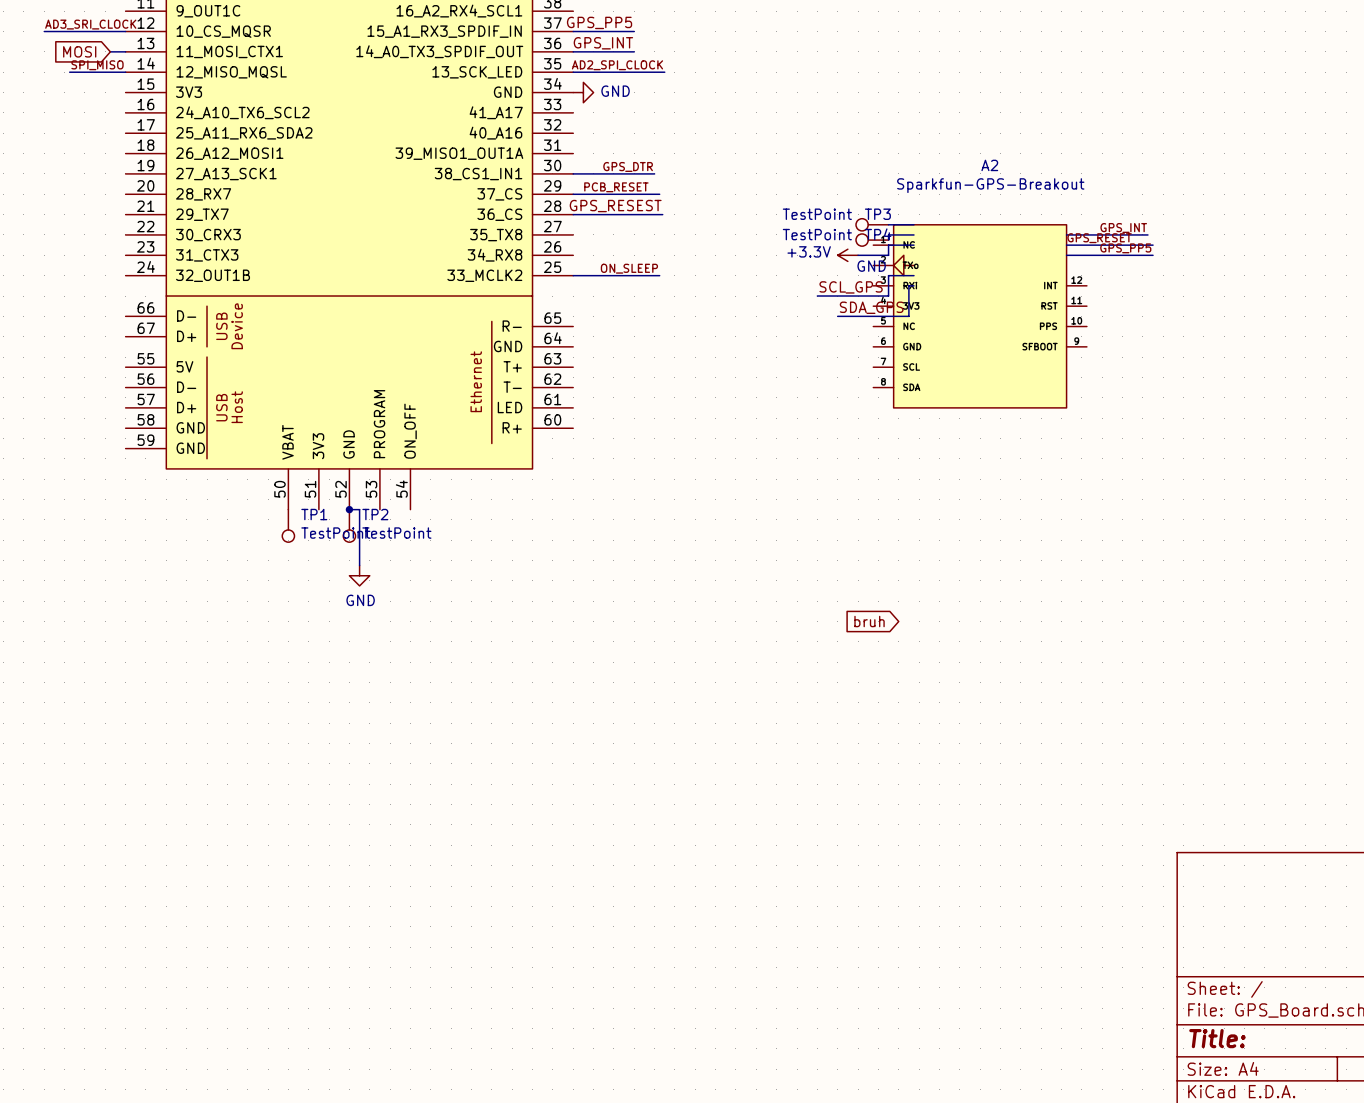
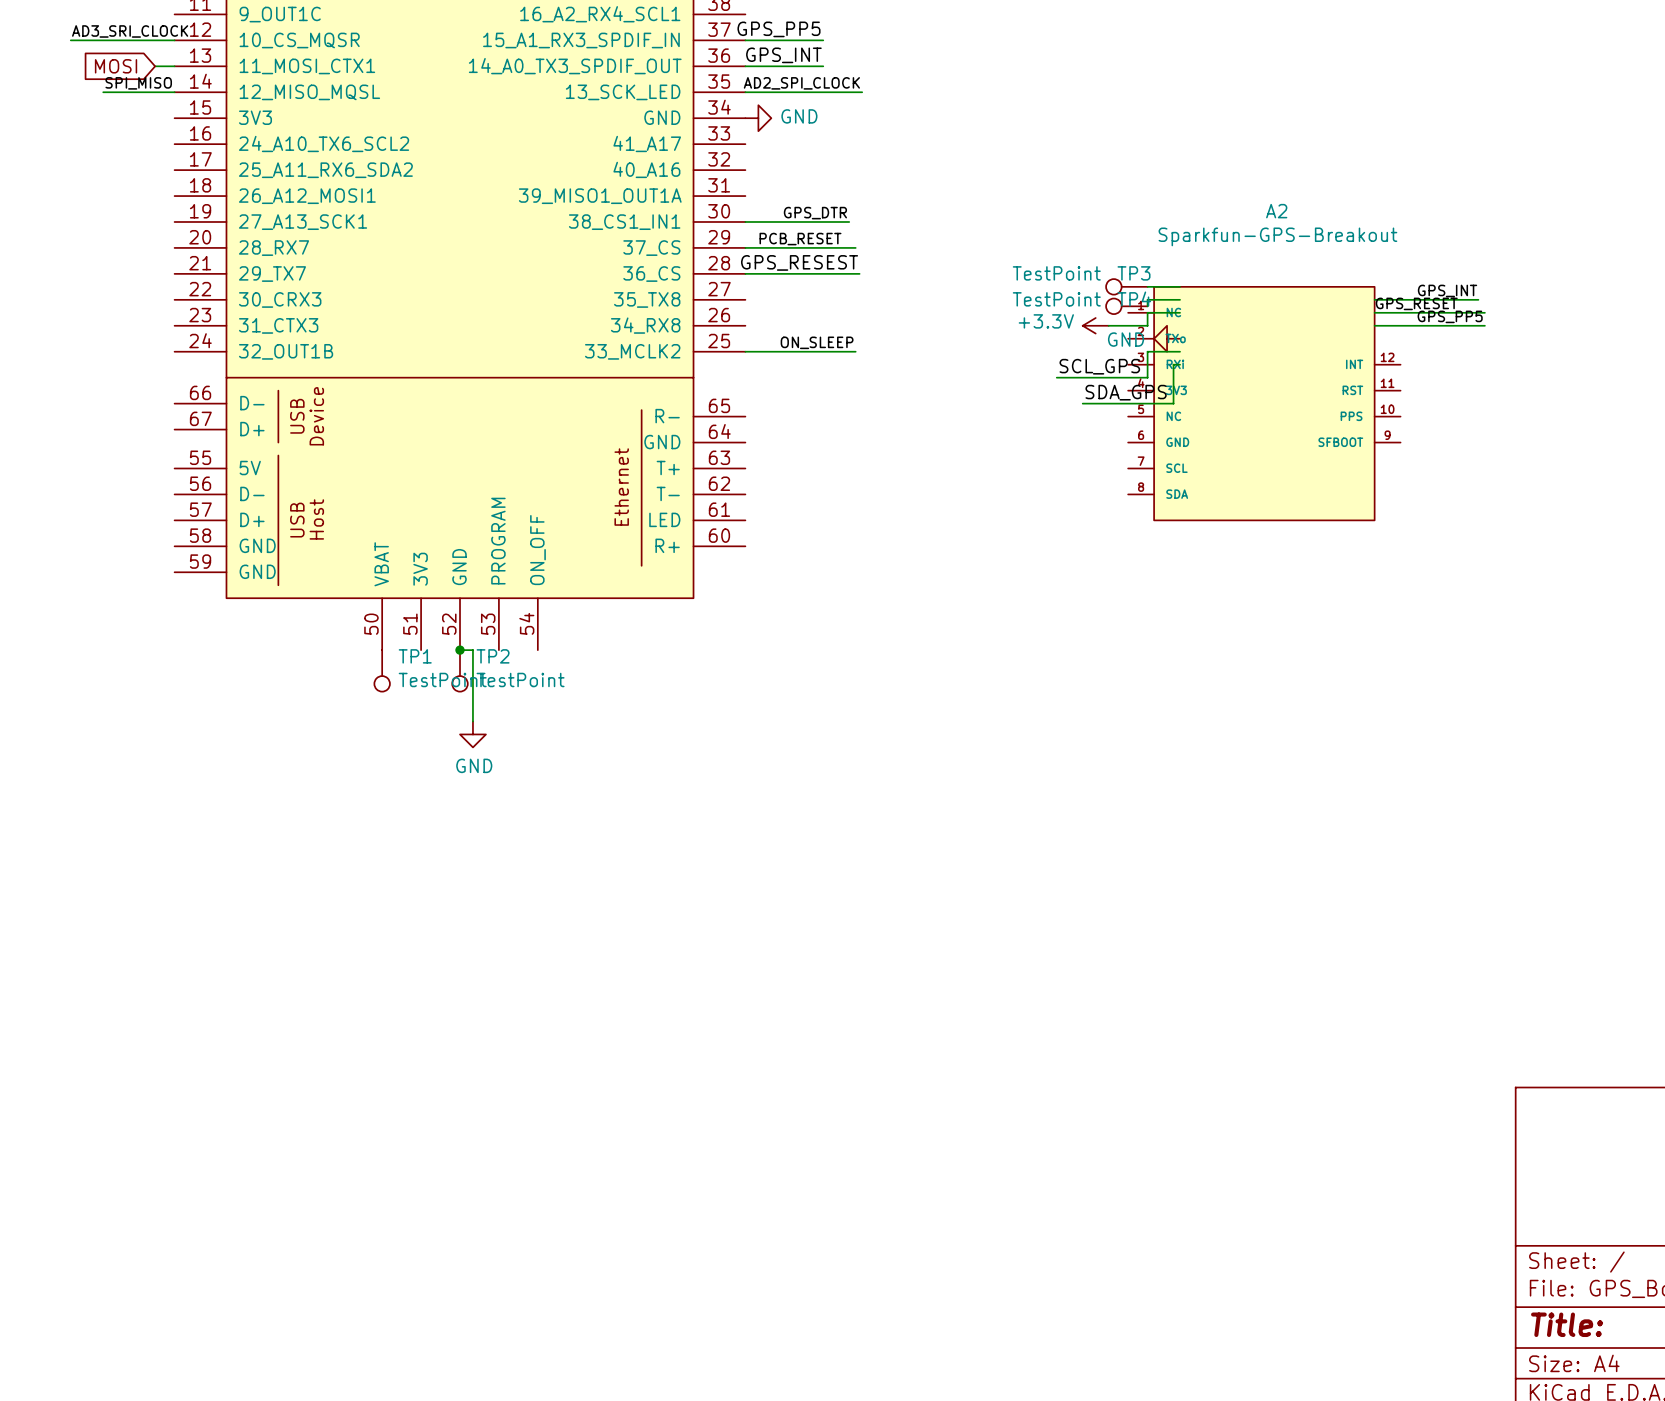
global label: bruh (869, 621) -> none

